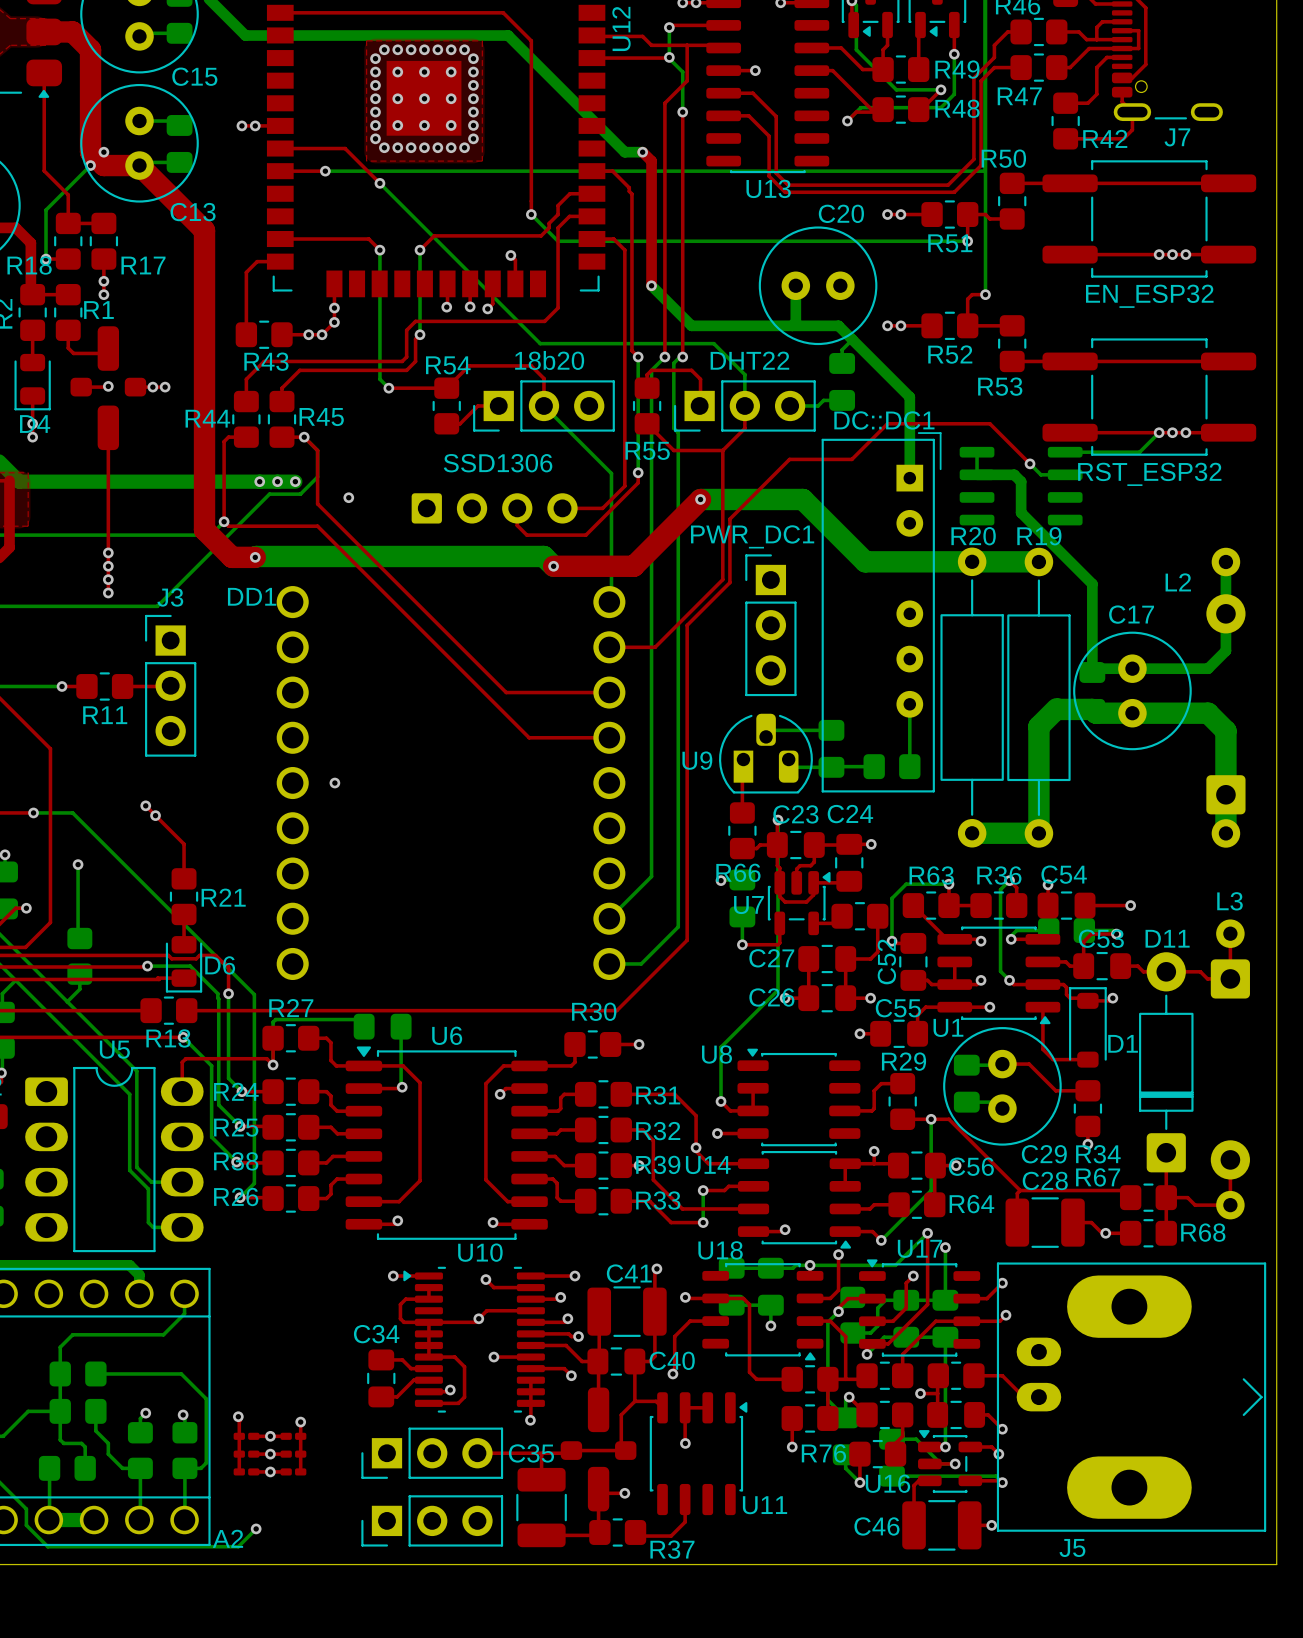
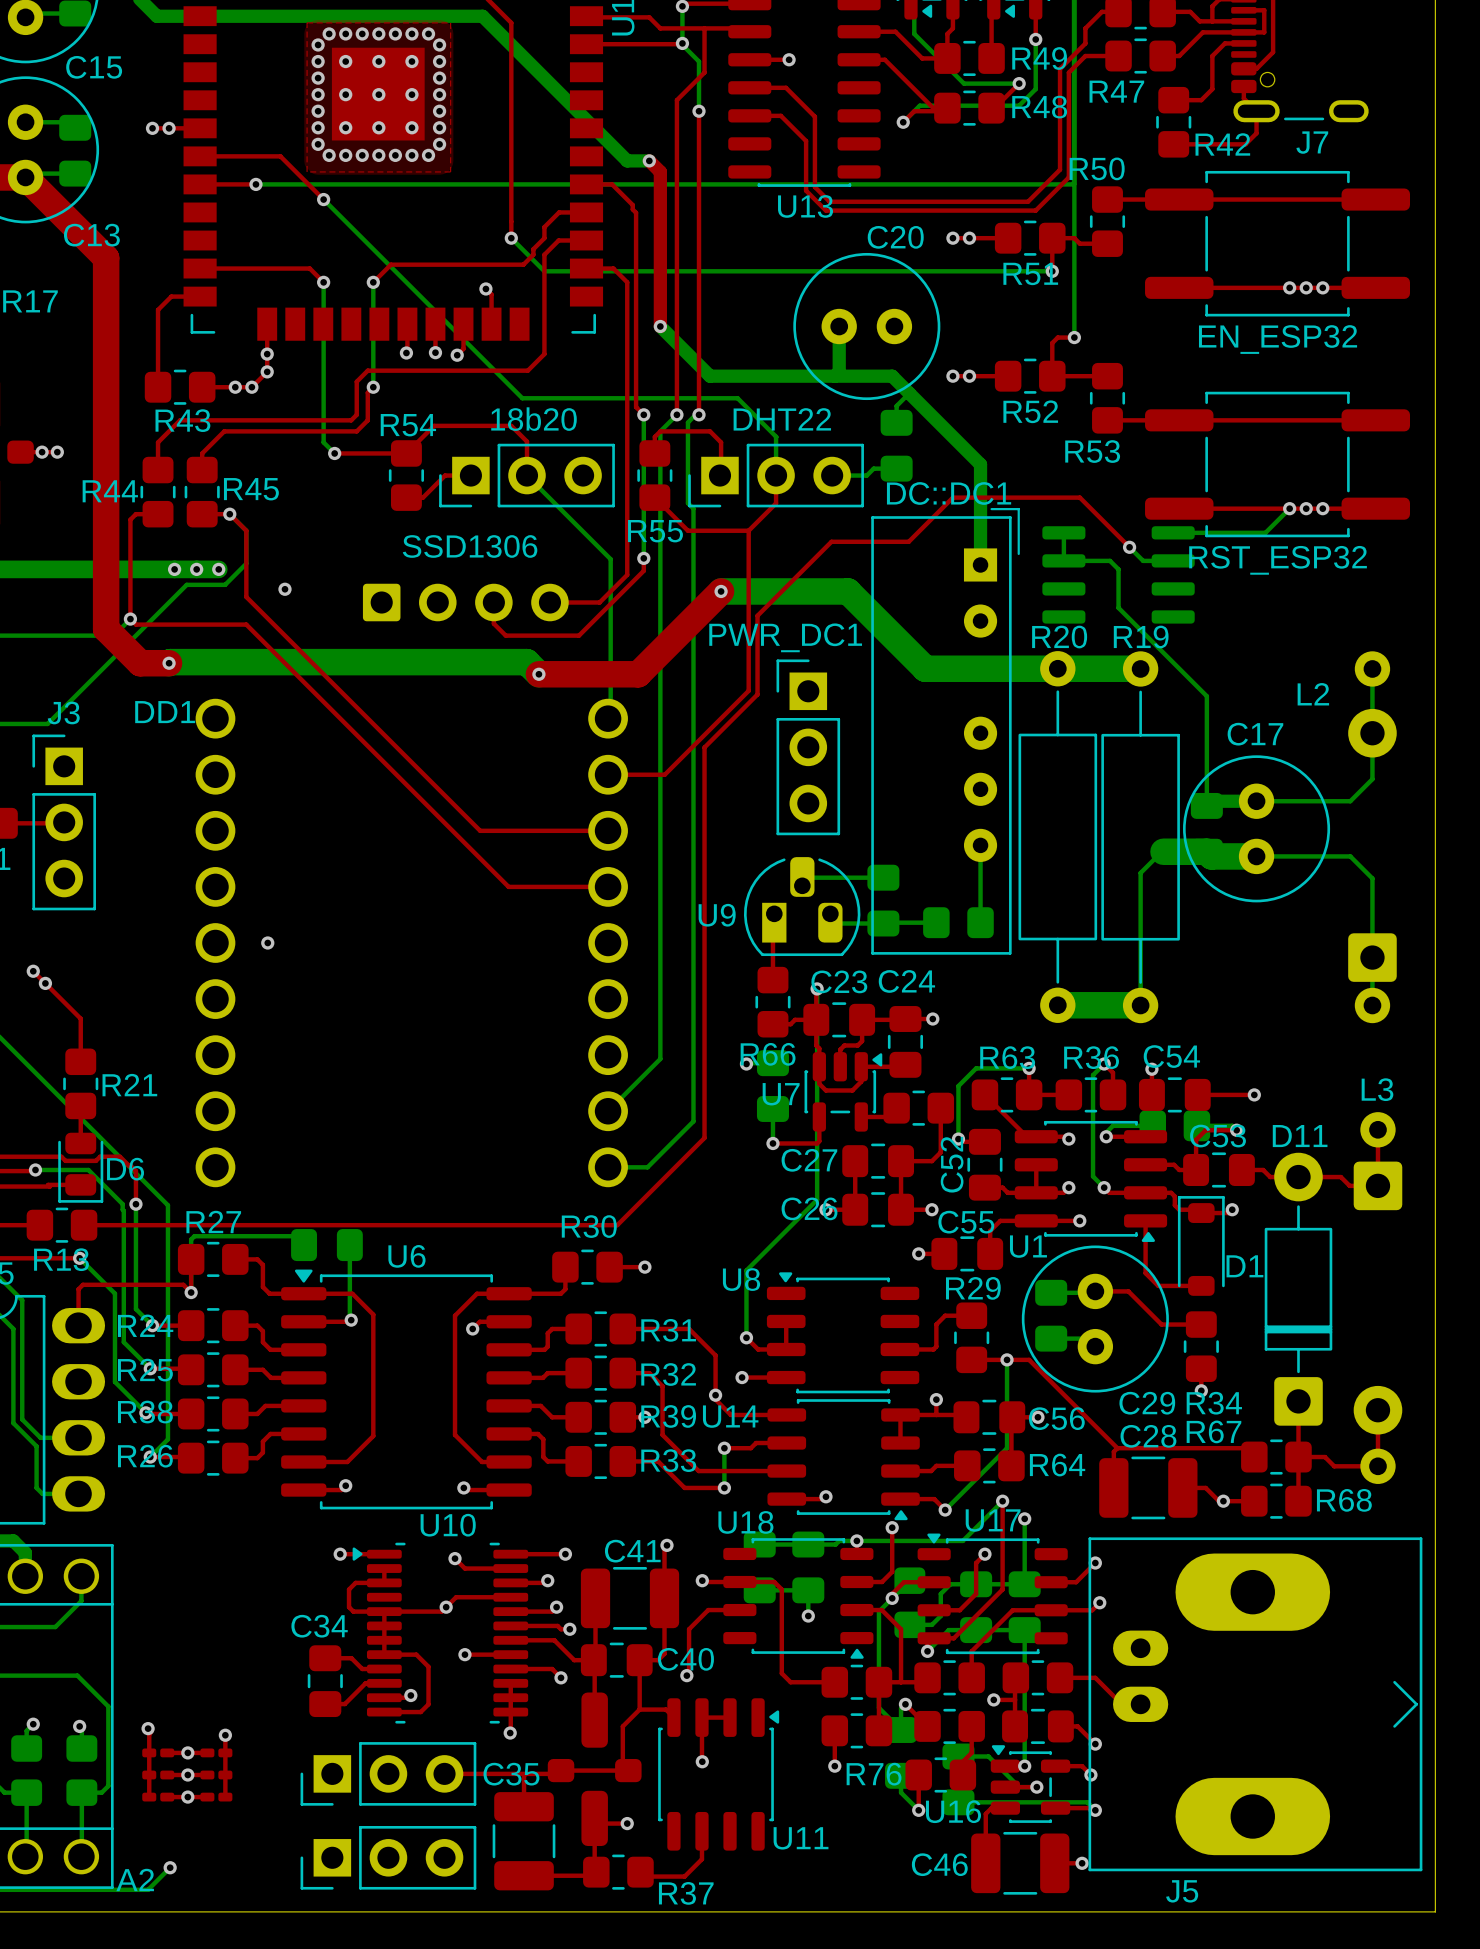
bottom track width: thick (977, 474) (1014, 474) (1021, 481) (1021, 512) (1092, 583) (1092, 672) -> thin (1063, 560) (1110, 560) (1118, 569) (1118, 607) (1206, 696) (1206, 805)
bottom track width: thick (1225, 562) (1225, 650) (1208, 668) (1132, 668) -> thin (1372, 668) (1372, 779) (1350, 801) (1256, 801)
bottom track width: thick (1056, 708) (1038, 726) (1038, 833) -> thin (1162, 850) (1140, 873) (1140, 1005)
bottom track width: thick (1132, 713) (1208, 713) (1225, 731) (1225, 833) -> thin (1256, 856) (1350, 856) (1372, 878) (1372, 1005)

